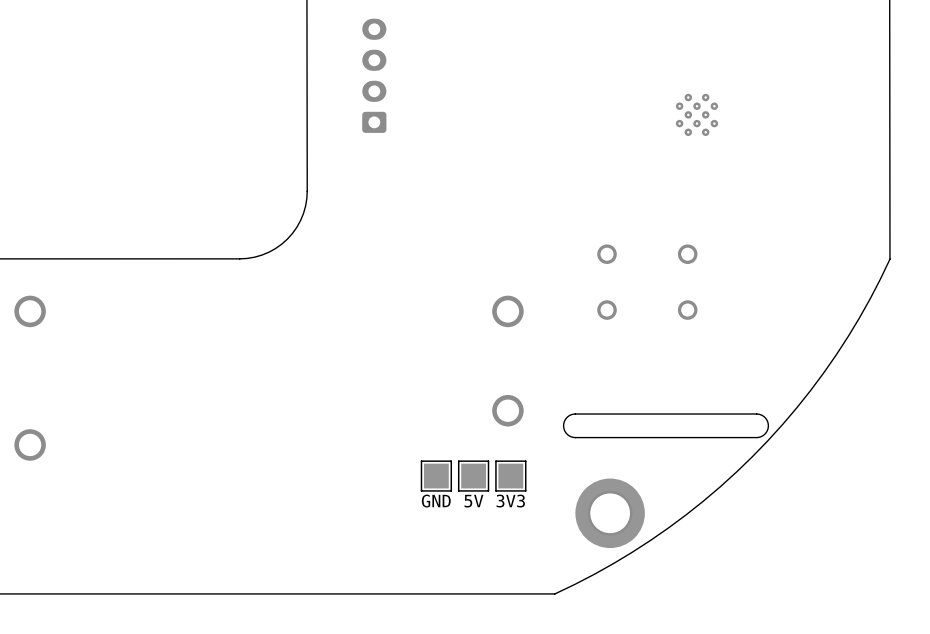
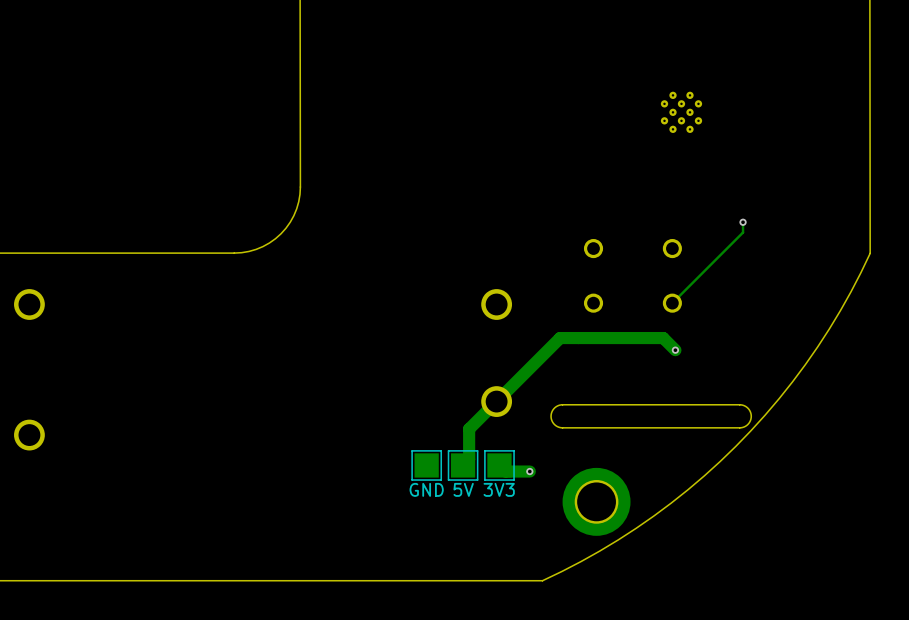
part: (374, 75) -> none
track: none -> (743, 222) (743, 232) (672, 303)
via: none -> (743, 222)
track: none -> (675, 350) (663, 338) (560, 338) (469, 429) (469, 459) (463, 465)
via: none -> (675, 350)
track: none -> (499, 465) (505, 471) (529, 471)
via: none -> (529, 471)

